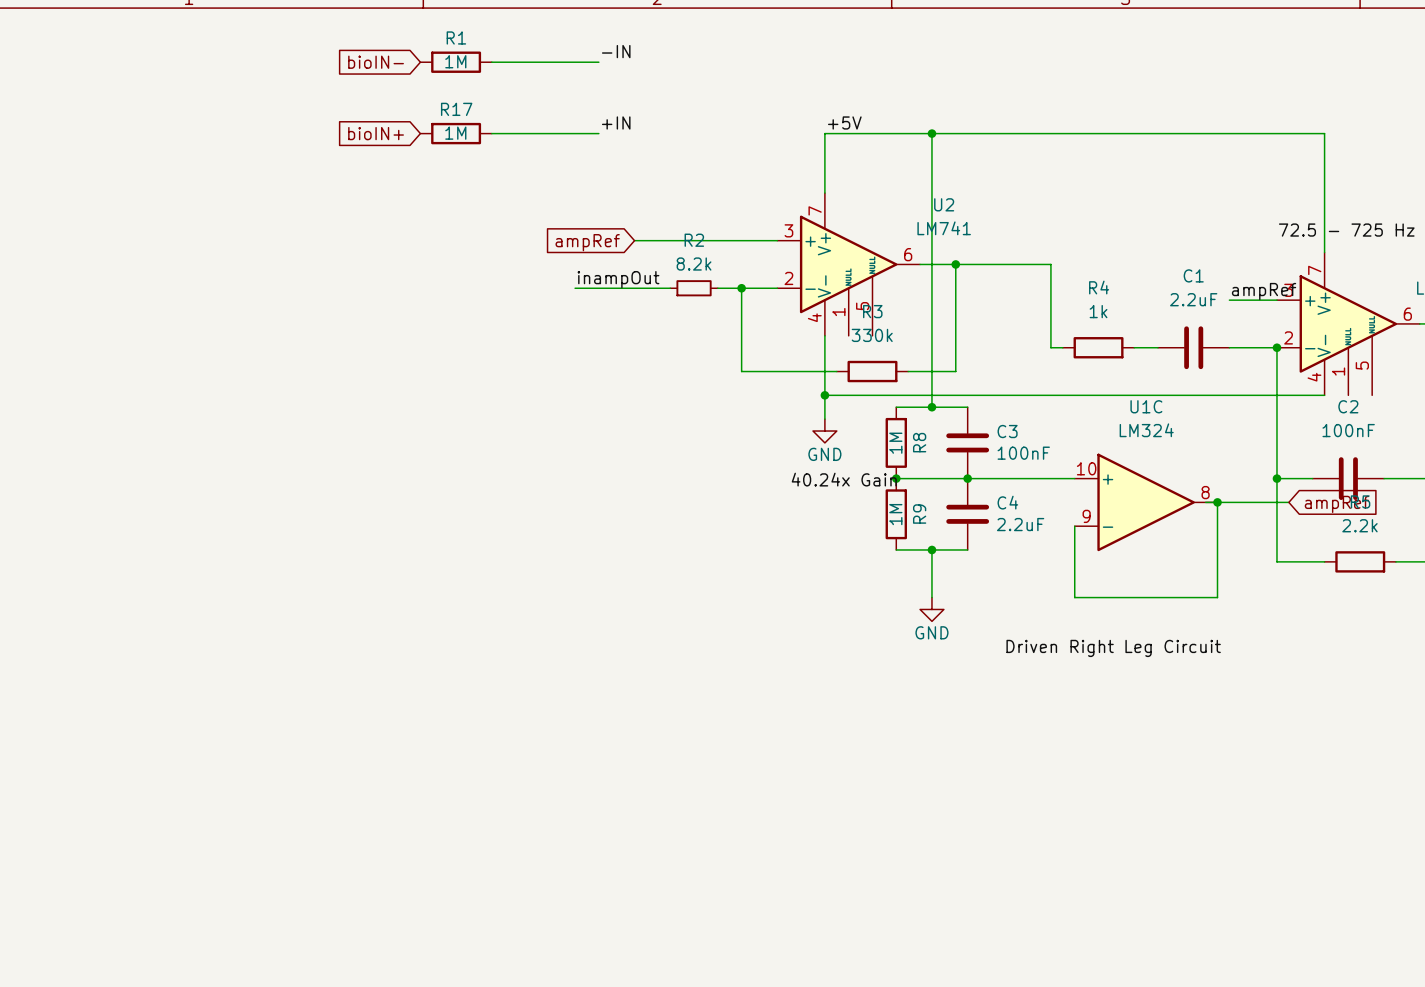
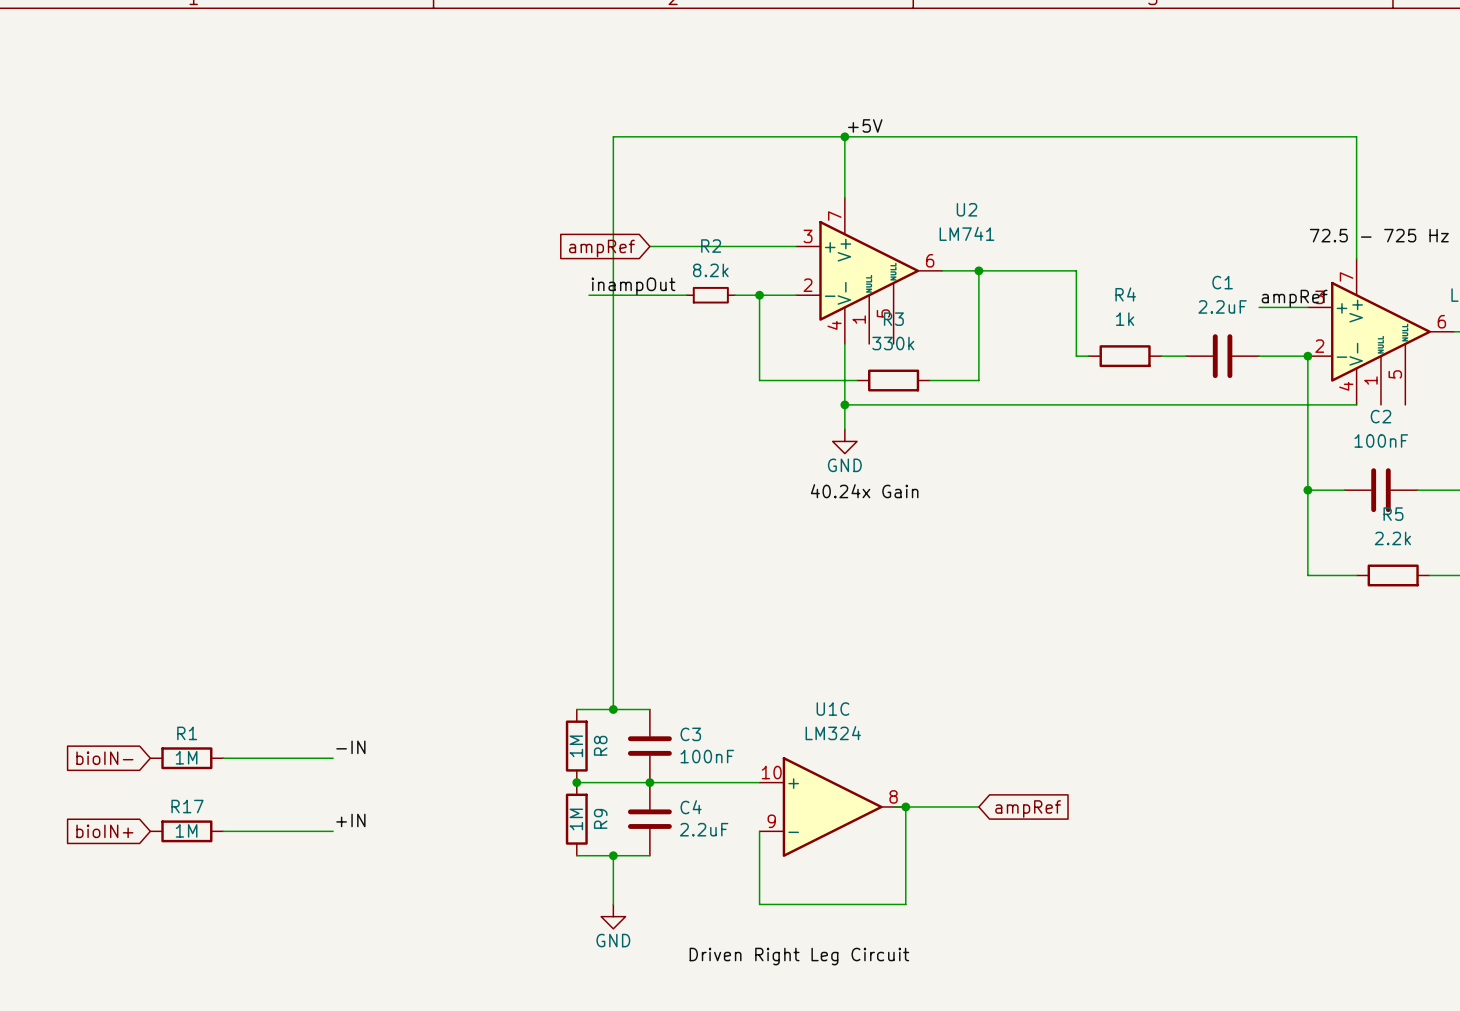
label: -IN (616, 51) -> none
global label: bioIN- (376, 62) -> none
R1 position: (456, 62) -> (186, 758)
wire: (491, 62) (598, 62) -> none
label: +IN (616, 122) -> none
global label: bioIN+ (376, 133) -> none
R17 position: (456, 133) -> (186, 831)
wire: (491, 133) (598, 133) -> none
wire: none -> (844, 136) (613, 136) (613, 709)
junction: none -> (844, 136)
wire: (931, 133) (931, 407) -> none
junction: (931, 133) -> none
wire: (896, 407) (967, 407) -> none
junction: (931, 407) -> none
R8 position: (896, 442) -> (576, 746)
C3 position: (967, 442) -> (649, 746)
wire: (896, 478) (1074, 478) -> none
junction: (896, 478) -> none
junction: (967, 478) -> none
U1C position: (1146, 502) -> (832, 806)
wire: (1205, 502) (1288, 502) -> none
wire: (1217, 502) (1217, 597) (1074, 597) (1074, 526) -> none
junction: (1217, 502) -> none
global label: ampRef (1336, 504) -> none
R9 position: (896, 514) -> (576, 819)
C4 position: (967, 514) -> (649, 819)
wire: (896, 549) (967, 549) -> none
wire: (931, 549) (931, 597) -> none
junction: (931, 549) -> none
power symbol: GND (931, 609) -> none
label: Driven Right Leg Circuit (1113, 648) -> none
wire: none -> (576, 709) (649, 709)
junction: none -> (613, 709)
label: none -> -IN (350, 747)
global label: none -> bioIN- (104, 758)
wire: none -> (223, 758) (333, 758)
wire: none -> (576, 782) (759, 782)
junction: none -> (576, 782)
junction: none -> (649, 782)
wire: none -> (893, 806) (978, 806)
wire: none -> (905, 806) (905, 904) (759, 904) (759, 831)
junction: none -> (905, 806)
global label: none -> ampRef (1028, 809)
label: none -> +IN (350, 820)
global label: none -> bioIN+ (104, 831)
wire: none -> (223, 831) (333, 831)
wire: none -> (576, 855) (649, 855)
wire: none -> (613, 855) (613, 904)
junction: none -> (613, 855)
power symbol: none -> GND (613, 916)
label: none -> Driven Right Leg Circuit (799, 956)

